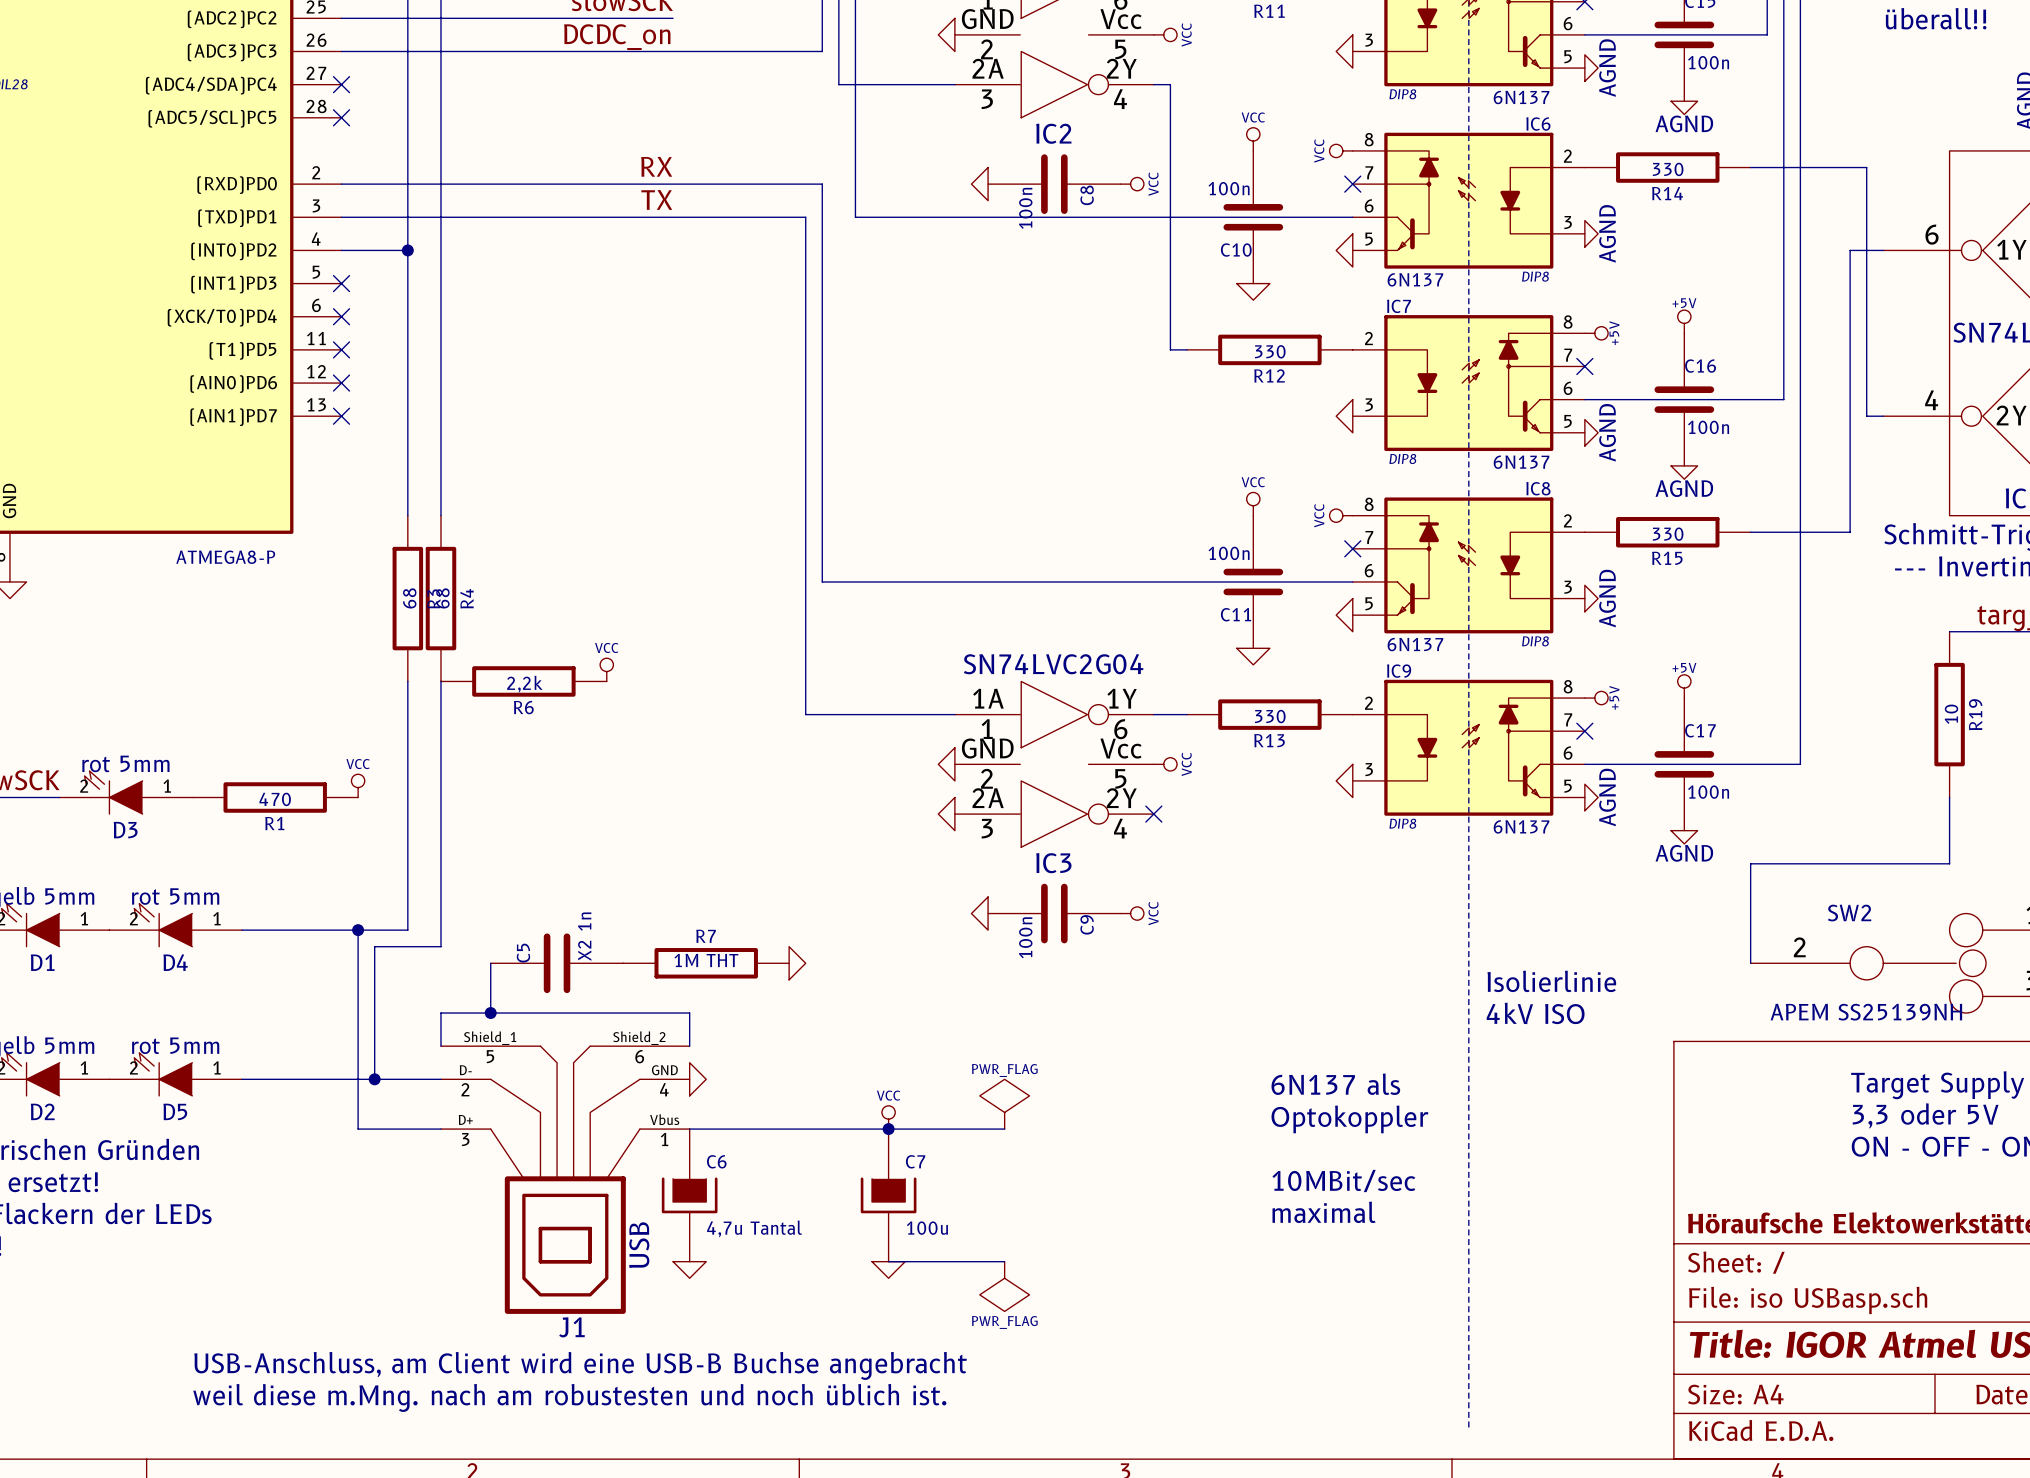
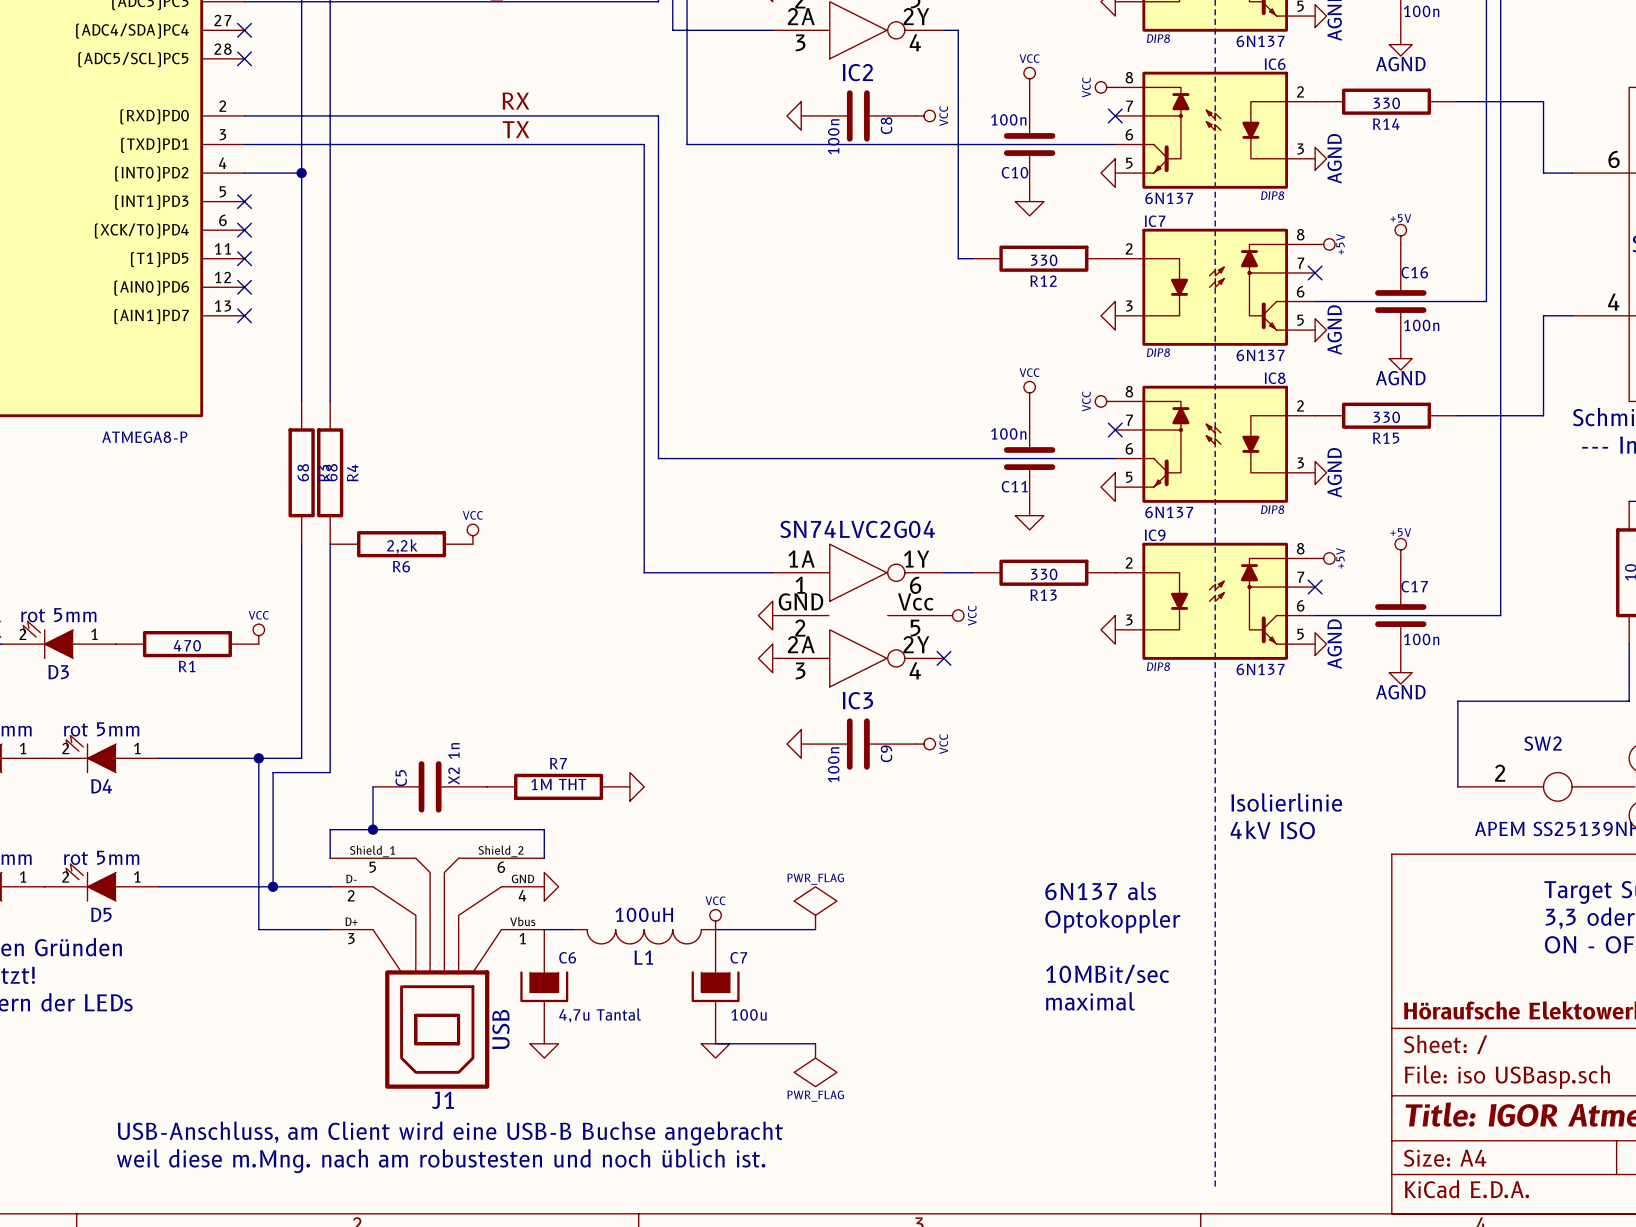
wire: (1850, 167) (1866, 167) (1866, 416) -> (1543, 101) (1543, 173)
wire: (1850, 250) (1850, 416) -> (1557, 315) (1543, 315)
wire: (722, 1129) (888, 1129) -> none
junction: (888, 1129) -> none
L1: none -> 100uH (644, 936)

